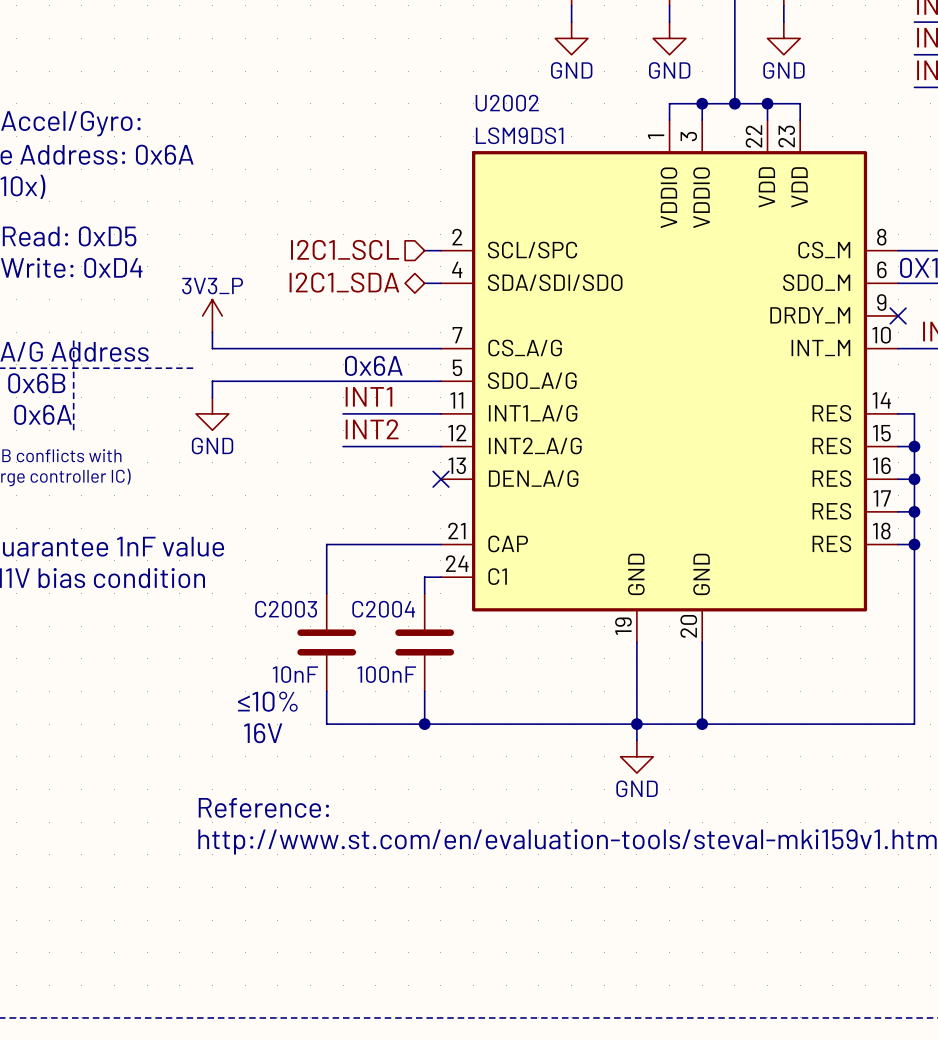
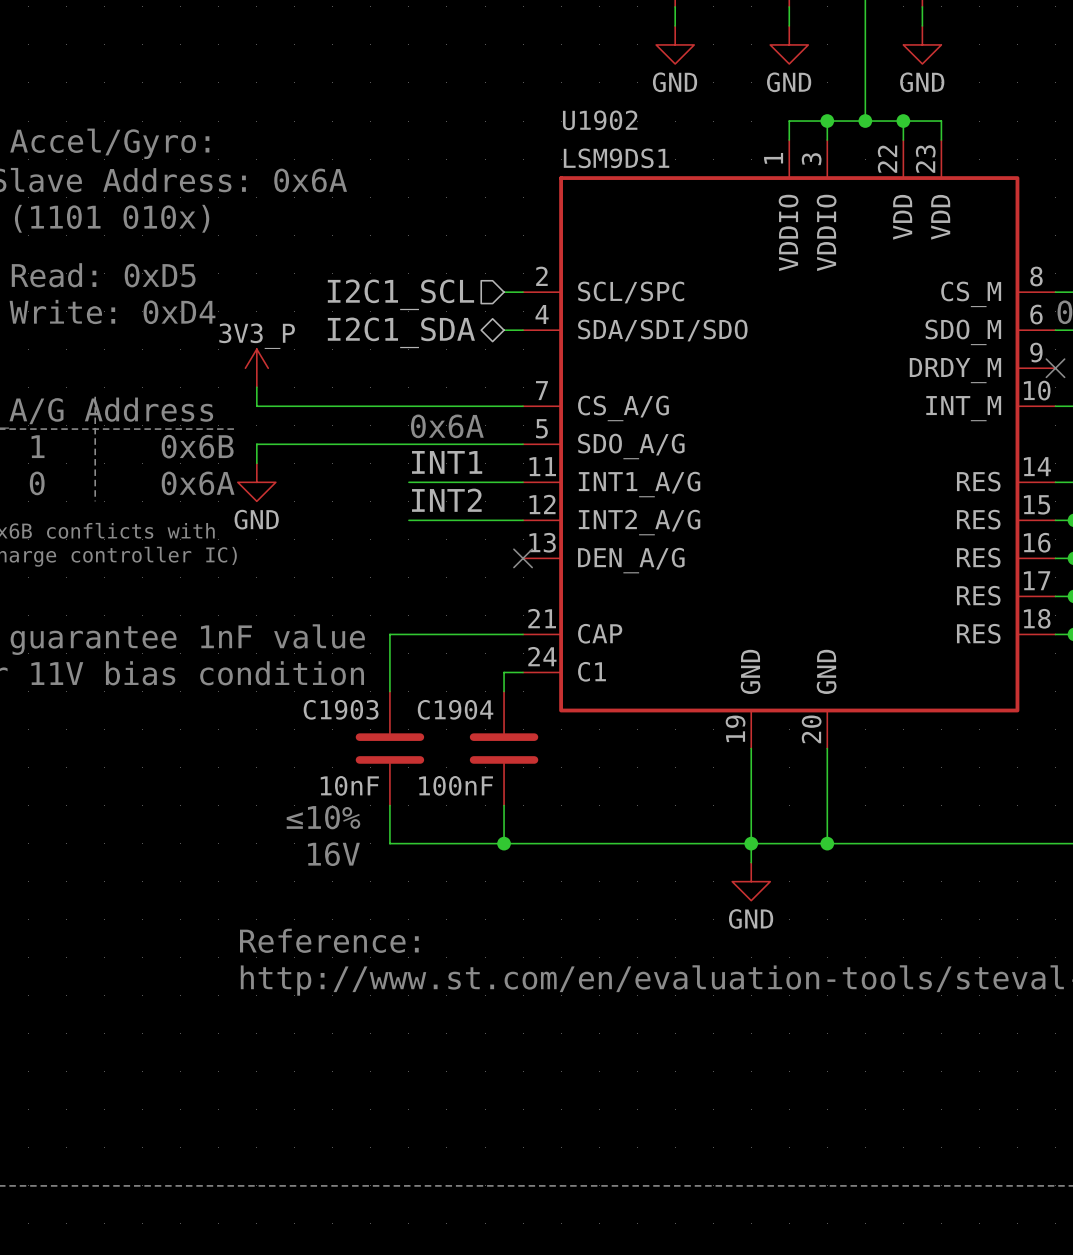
U2002 name: U2002 (507, 103) -> U1902 (600, 120)
C2003 name: C2003 (286, 609) -> C1903 (341, 709)
C2004 name: C2004 (383, 609) -> C1904 (455, 709)

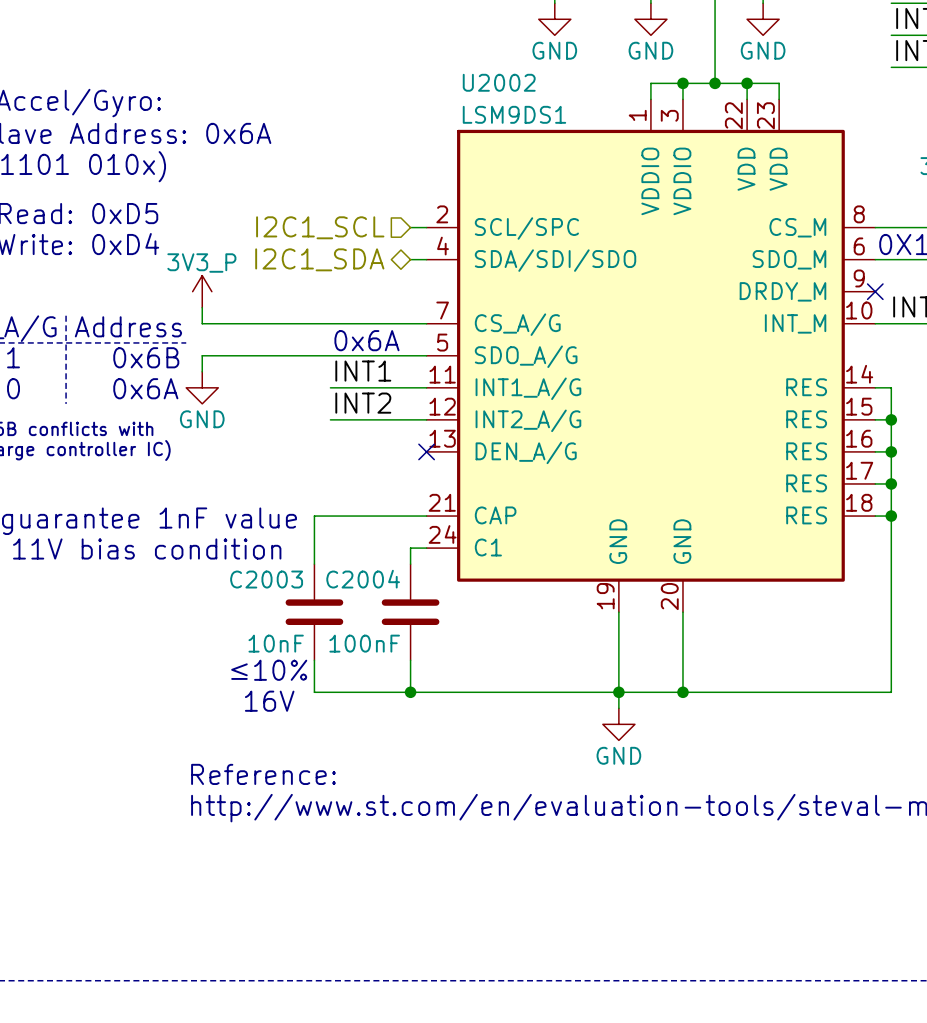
U1902 name: U1902 (600, 120) -> U2002 (499, 82)
C1903 name: C1903 (341, 709) -> C2003 (266, 579)
C1904 name: C1904 (455, 709) -> C2004 (363, 579)

